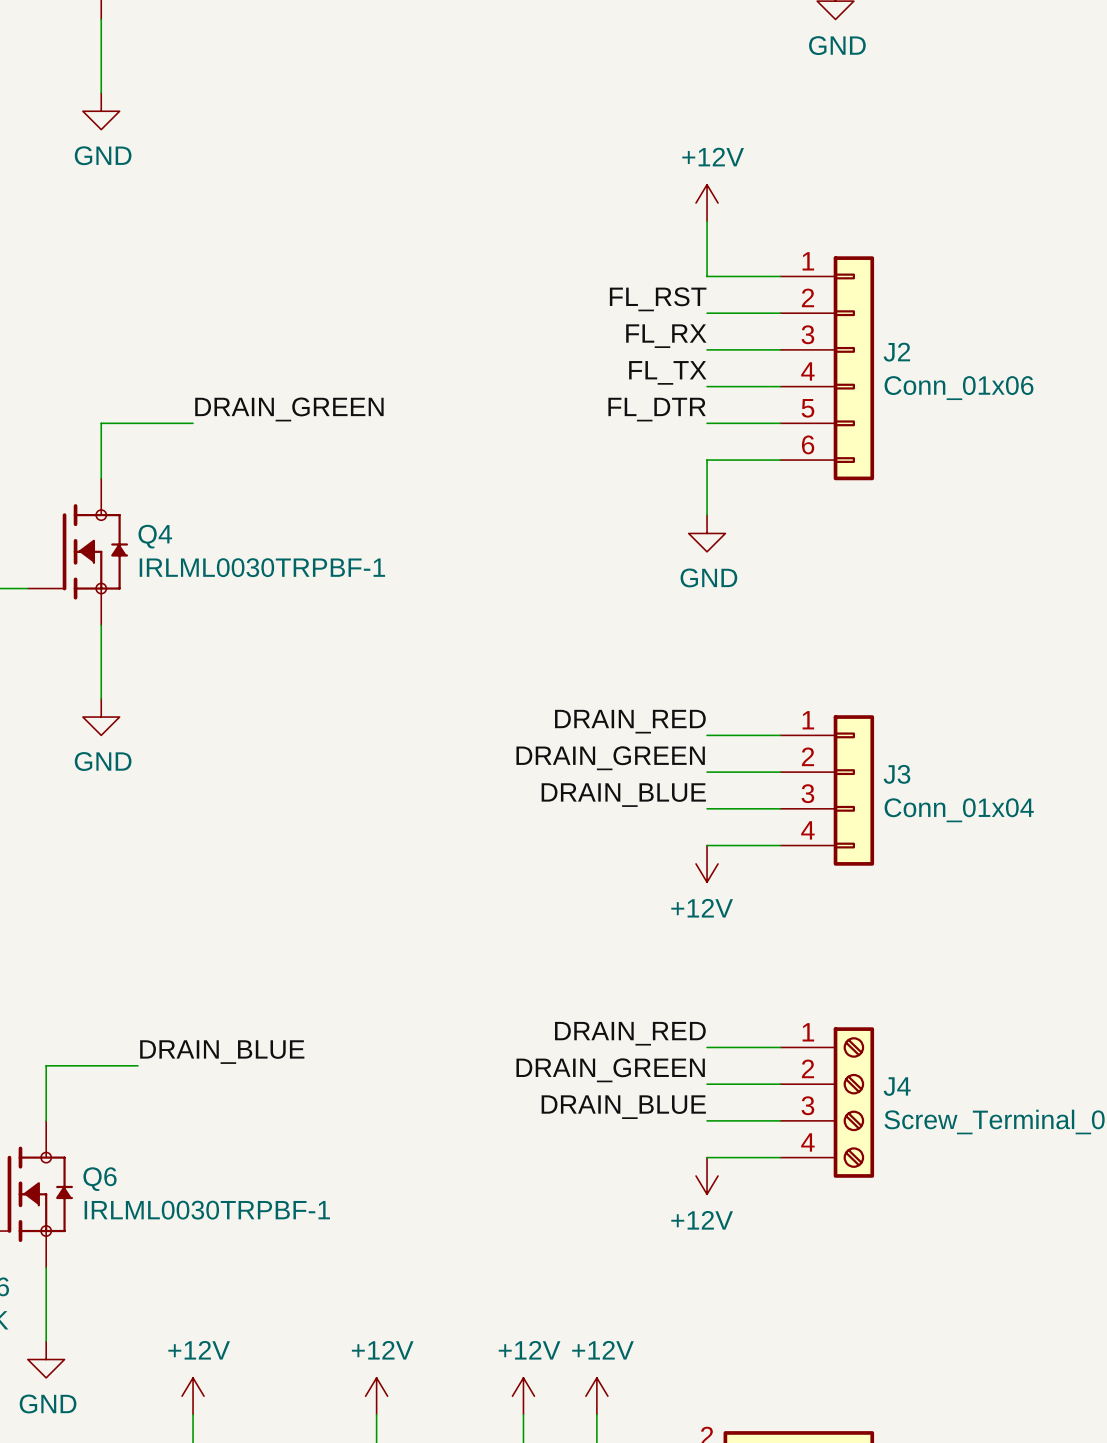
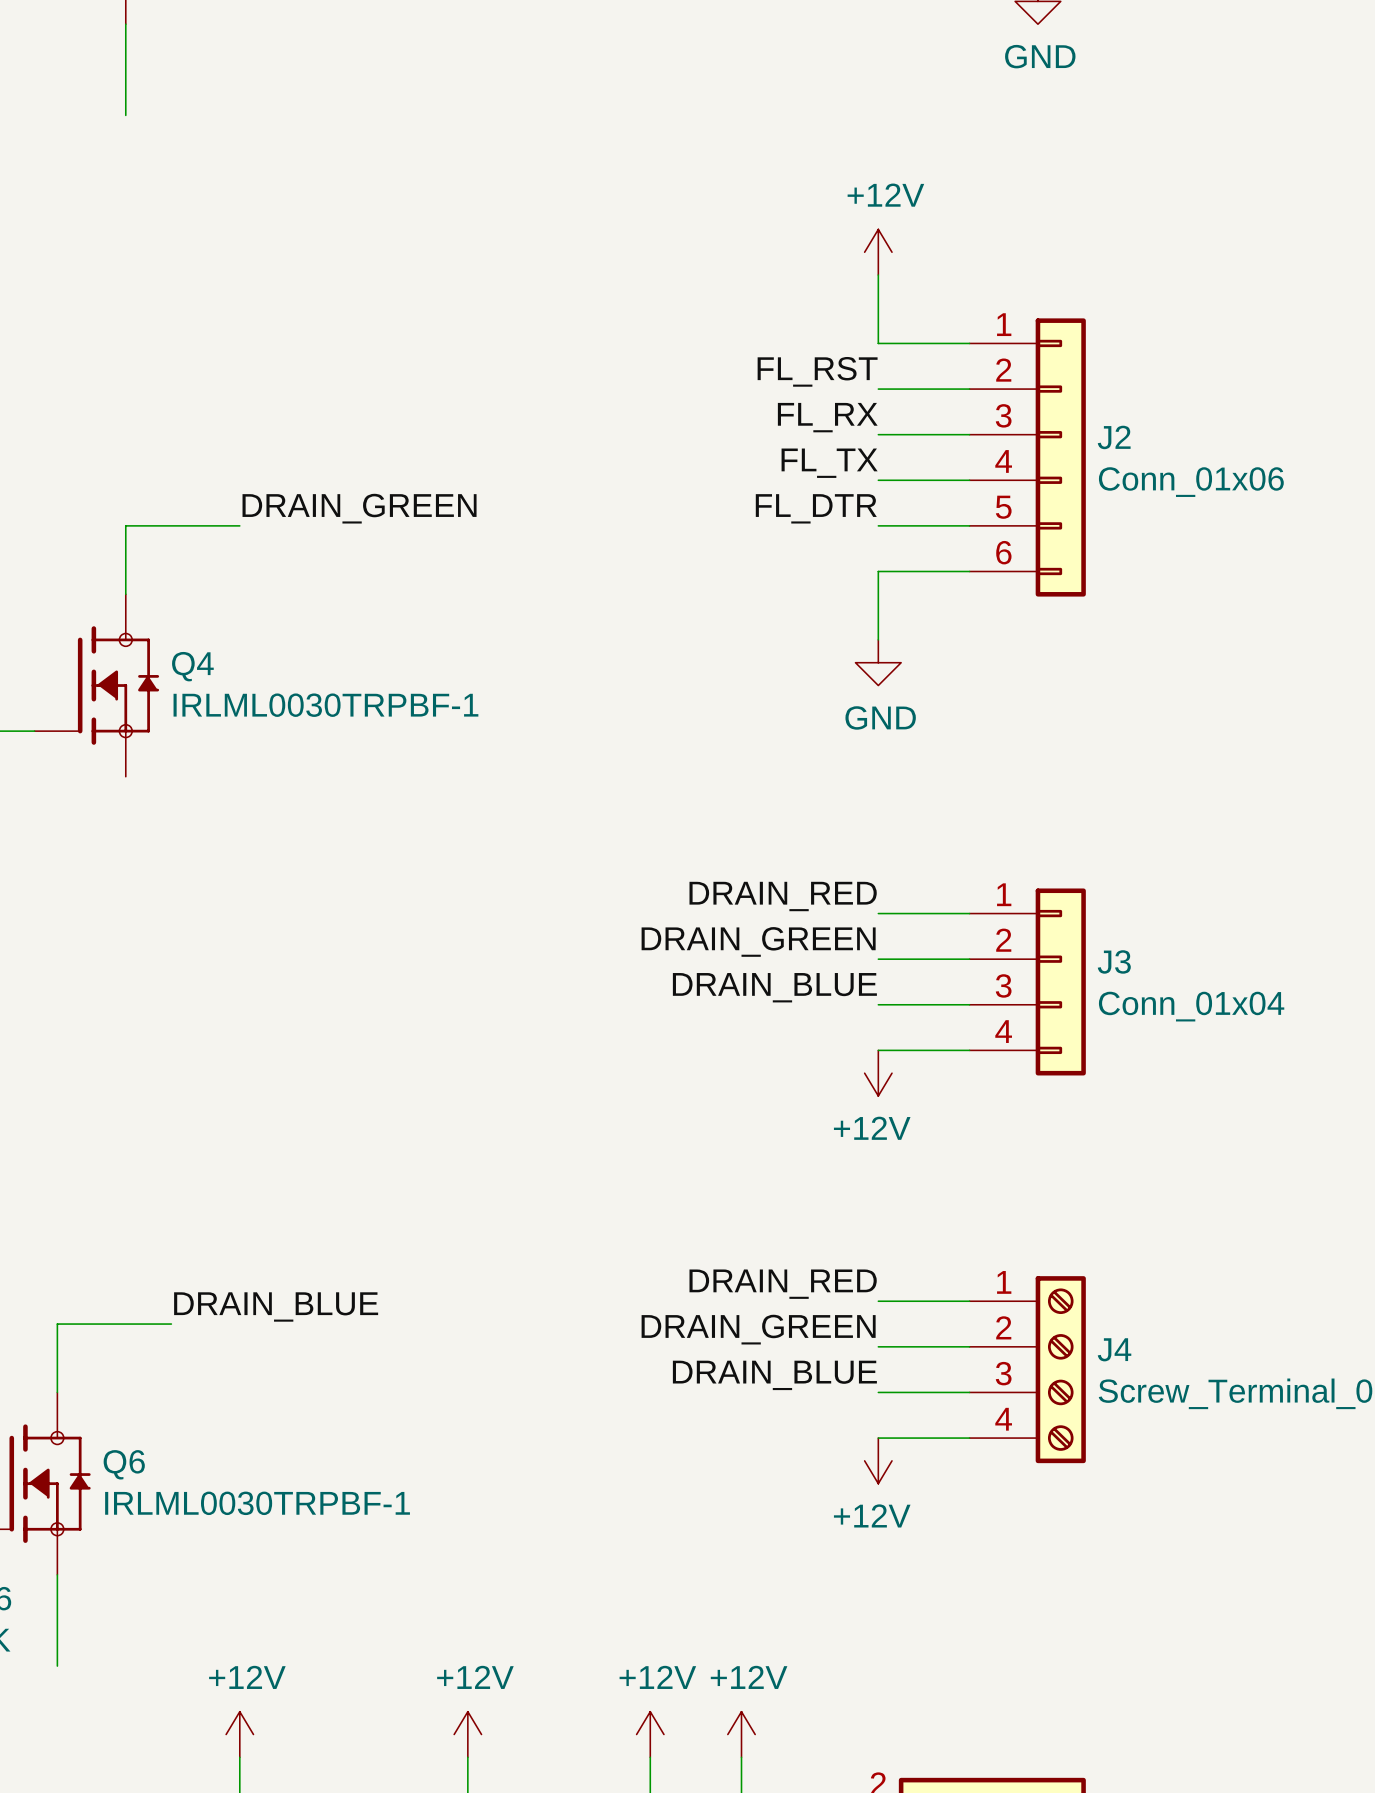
power symbol: GND (101, 111) -> none
wire: (101, 625) (101, 698) -> none
power symbol: GND (101, 717) -> none
power symbol: GND (46, 1359) -> none

